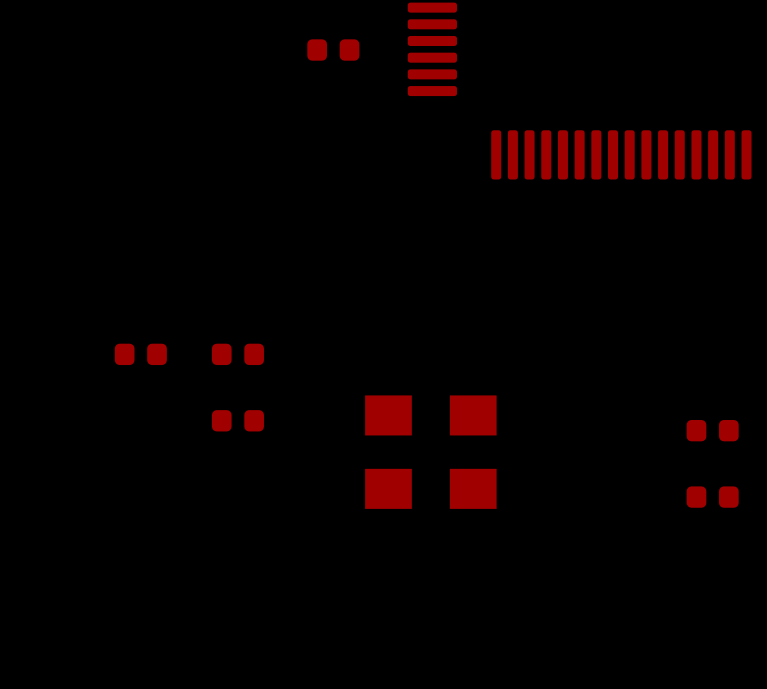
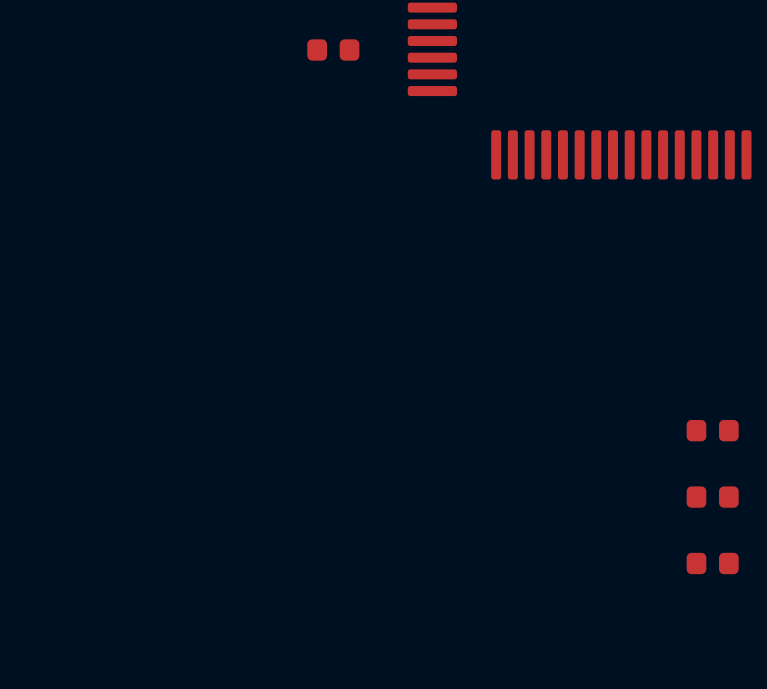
part: (140, 354) -> none
part: (237, 354) -> none
part: (237, 420) -> none
part: (430, 452) -> none
part: none -> (712, 563)

